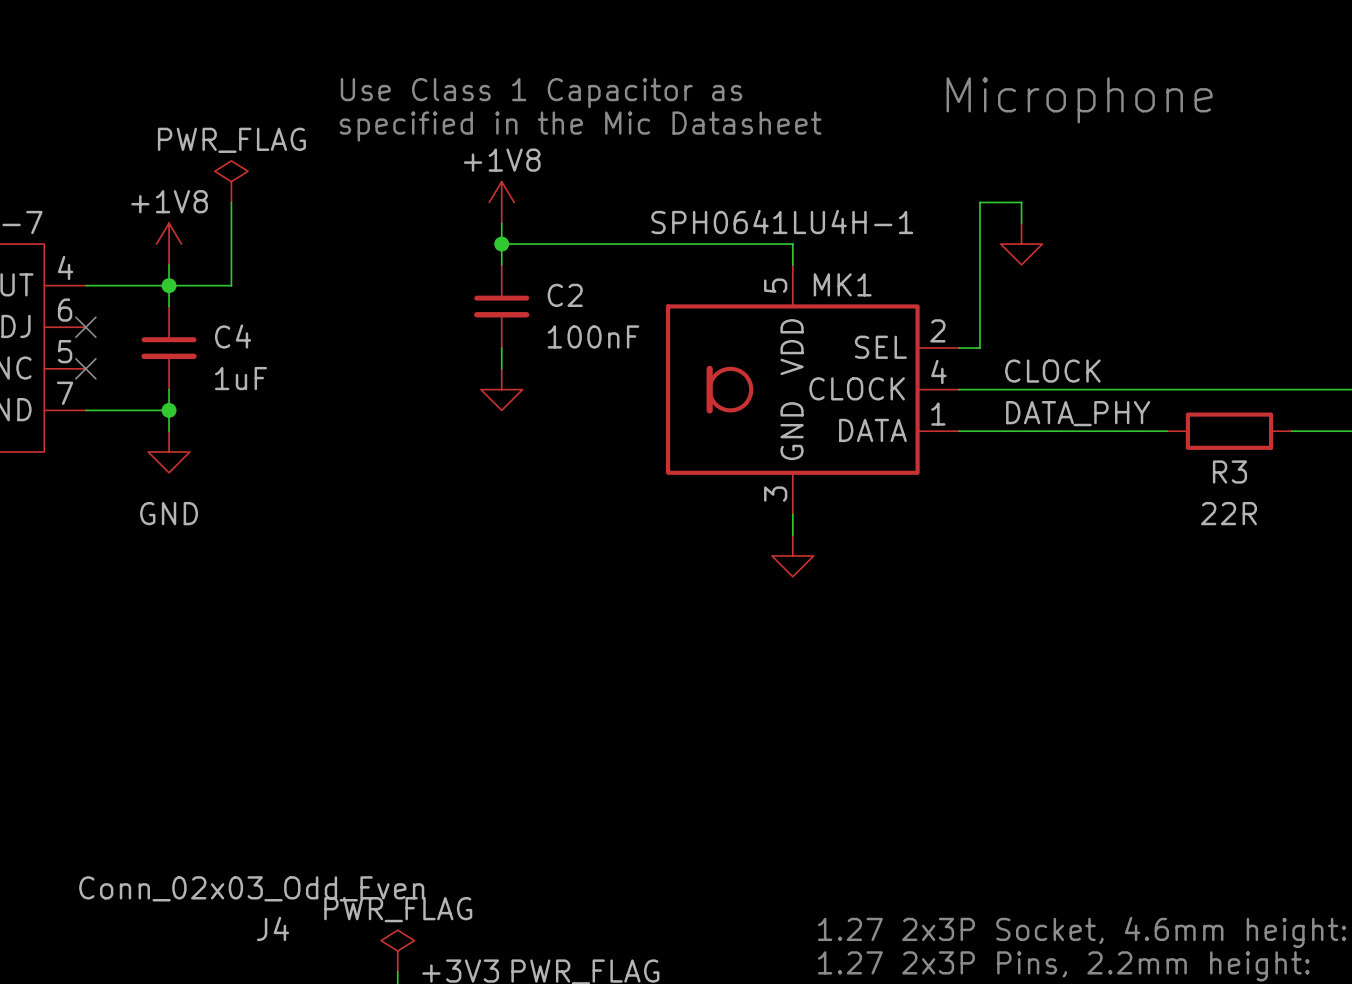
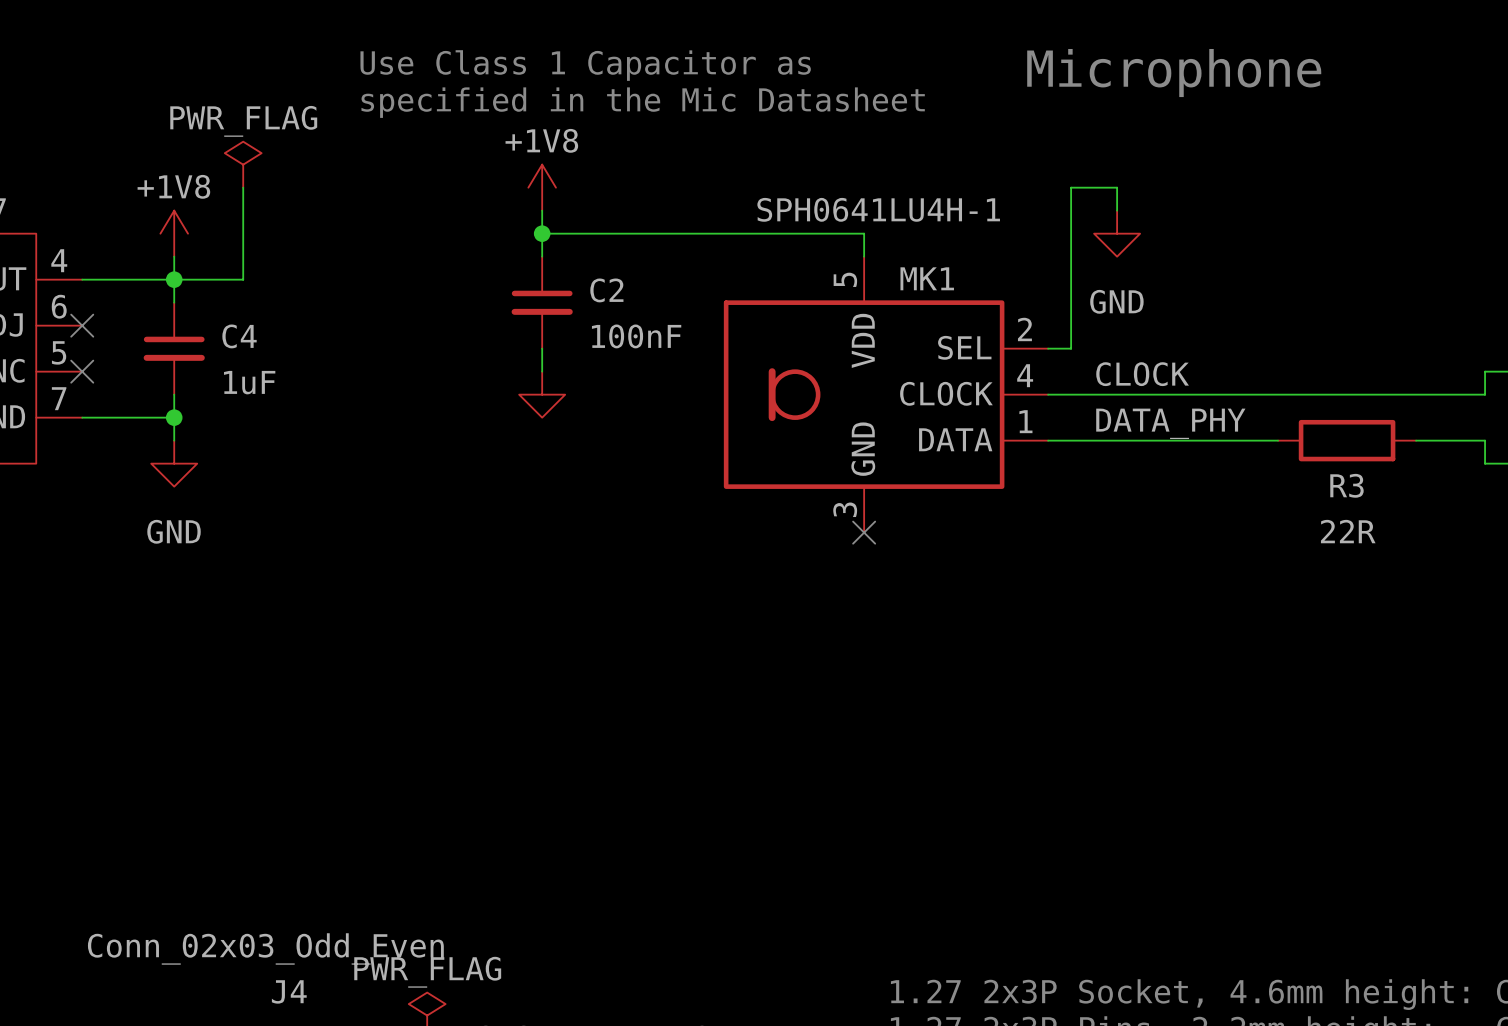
power symbol text: none -> GND (1116, 301)
wire: (792, 514) (792, 535) -> none
no-connect mark: none -> (864, 532)
power symbol: (792, 555) -> none

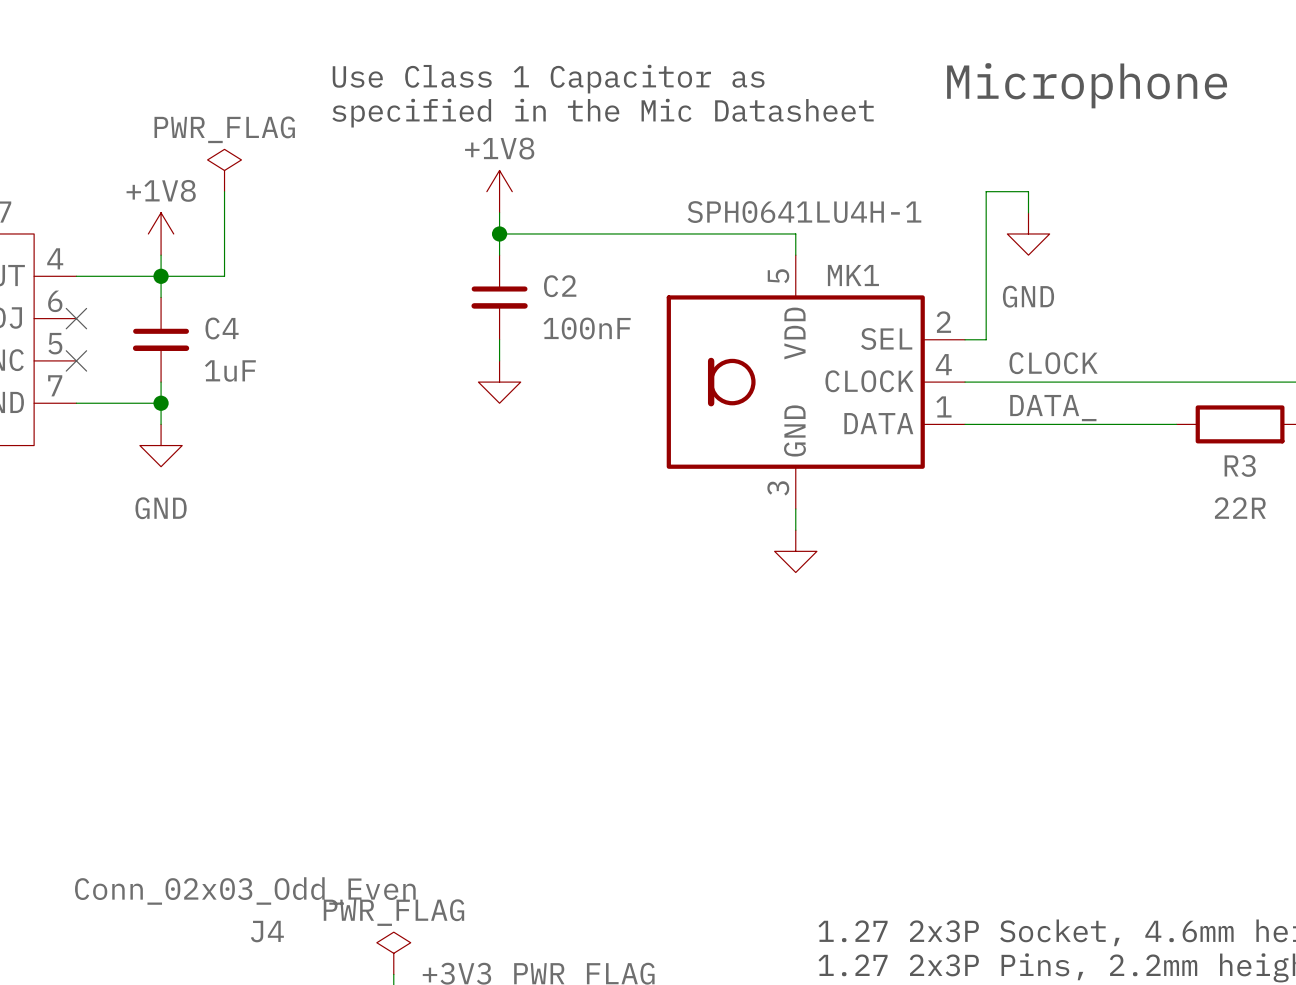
label: DATA_PHY (1170, 423) -> DATA_ (1053, 408)
wire: none -> (795, 509) (795, 530)
no-connect mark: (864, 532) -> none
power symbol: none -> (795, 551)

